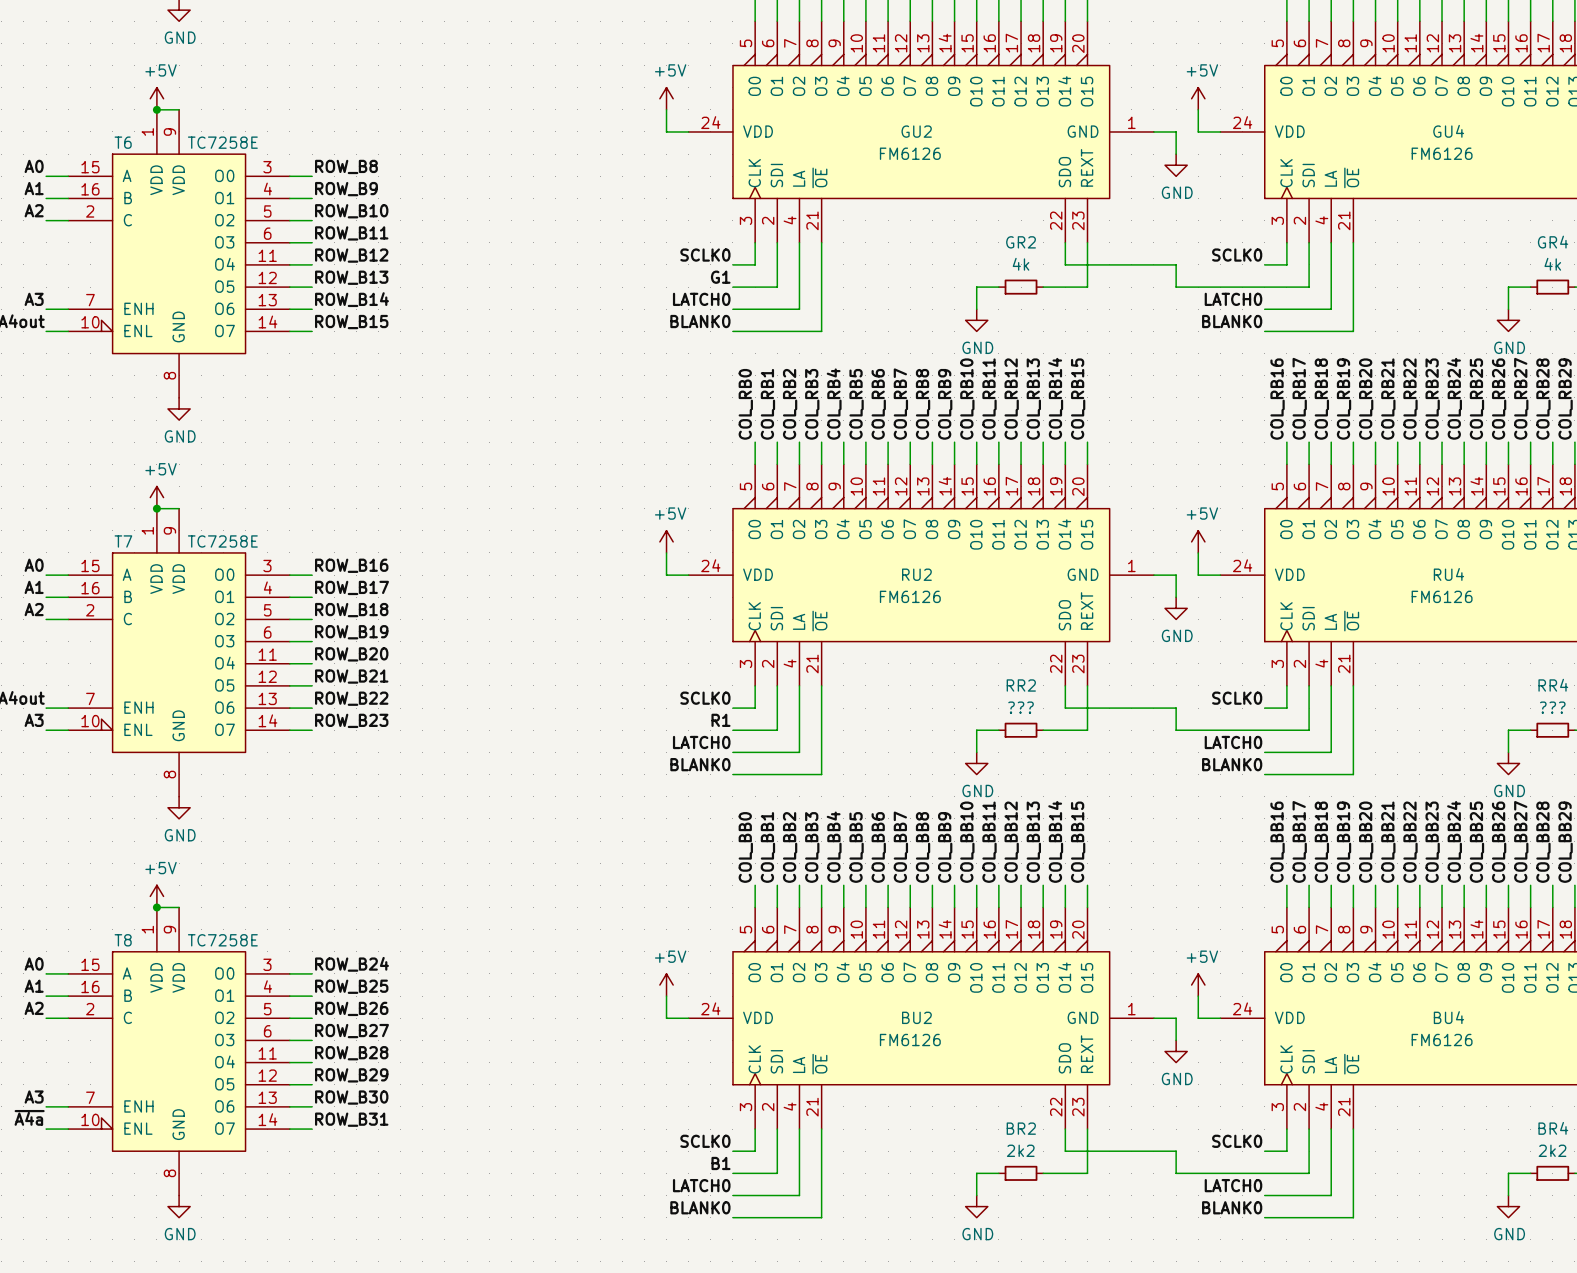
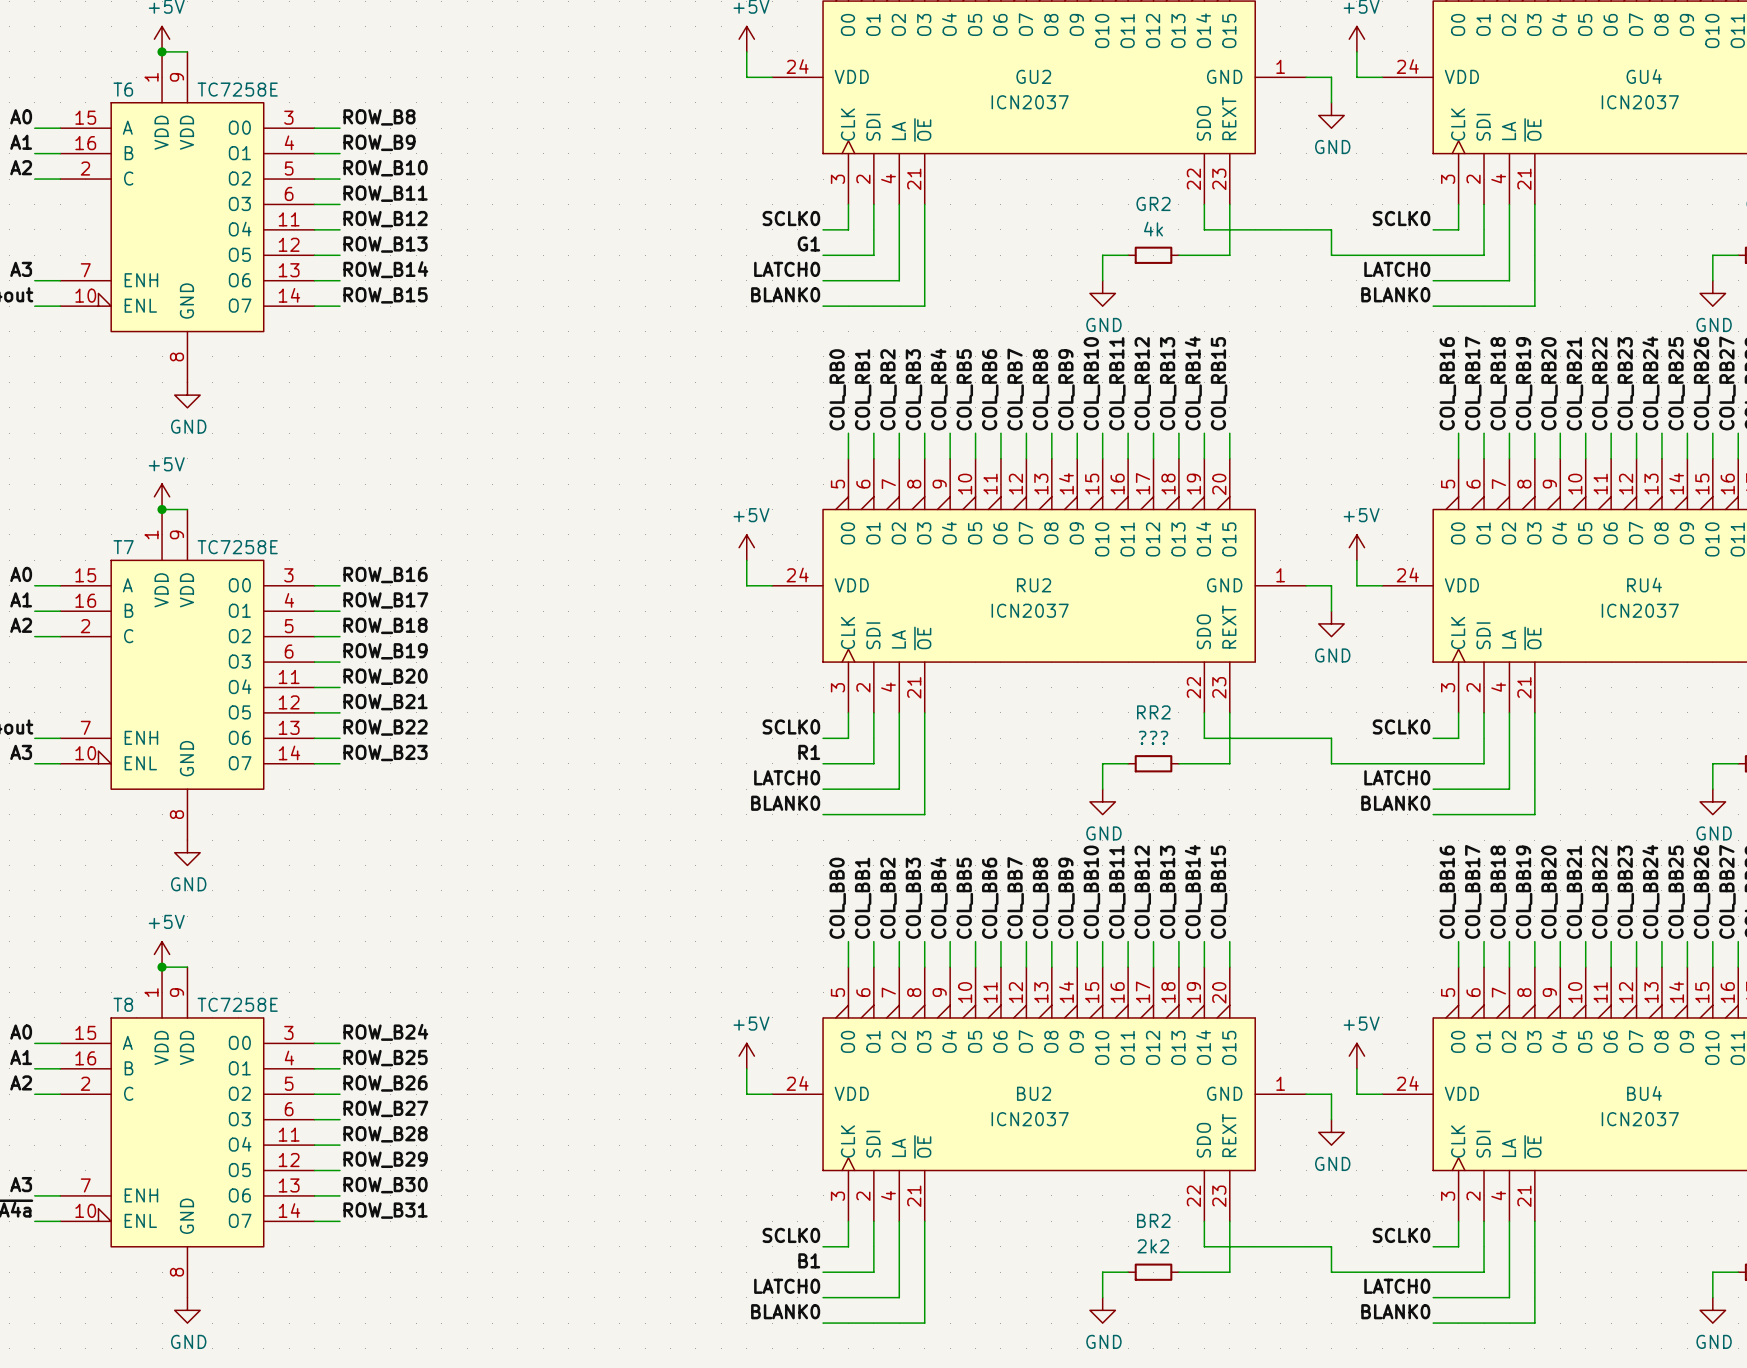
GU2 value: FM6126 (910, 153) -> ICN2037 (1030, 102)
GU4 value: FM6126 (1442, 153) -> ICN2037 (1640, 102)
RU2 value: FM6126 (910, 596) -> ICN2037 (1030, 610)
RU4 value: FM6126 (1442, 596) -> ICN2037 (1640, 610)
BU2 value: FM6126 (910, 1040) -> ICN2037 (1030, 1119)
BU4 value: FM6126 (1442, 1040) -> ICN2037 (1640, 1119)

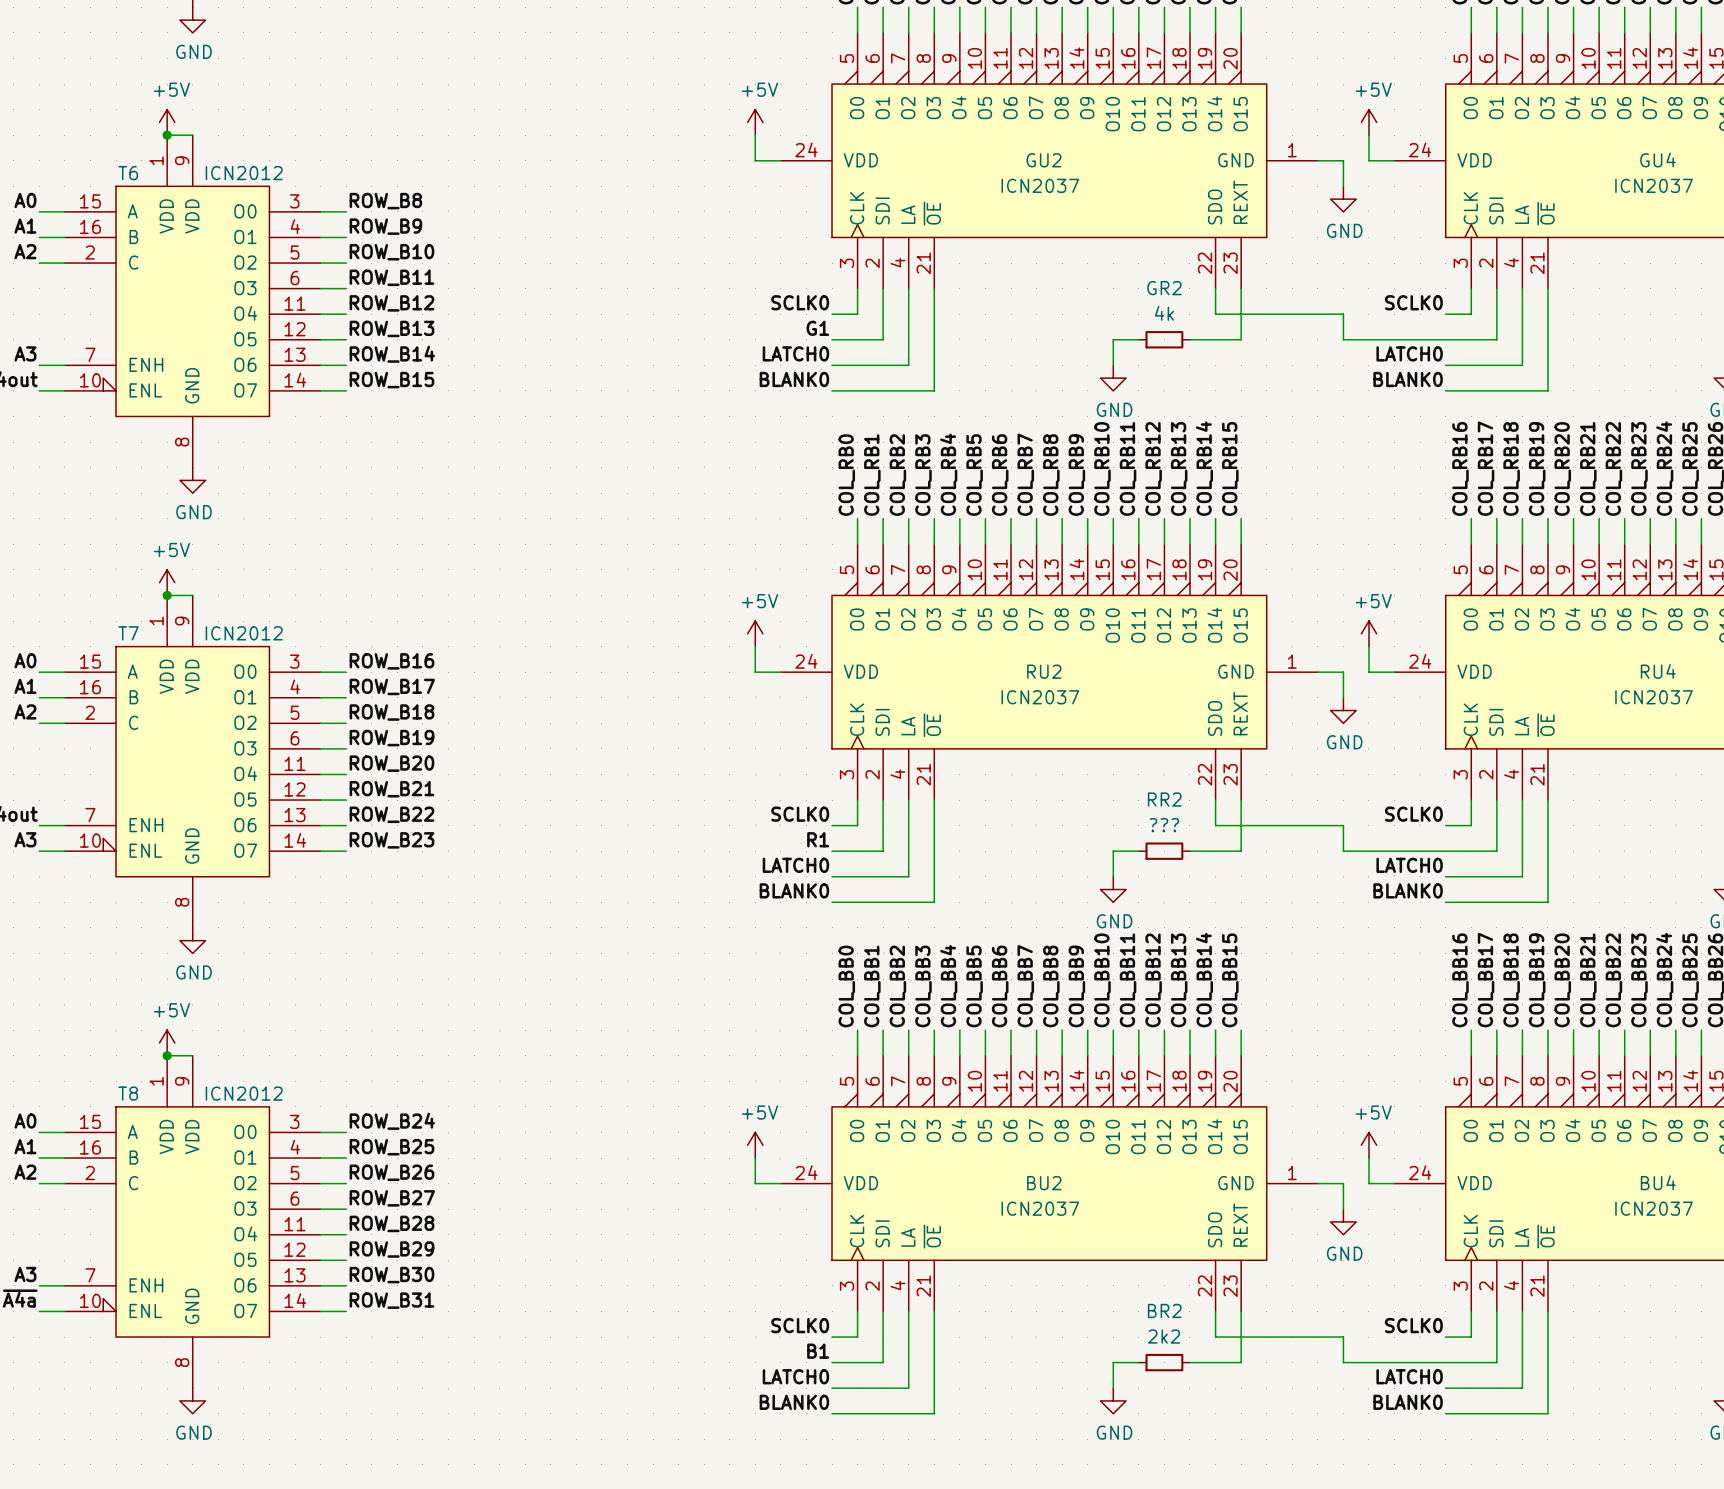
T6 value: TC7258E (237, 89) -> ICN2012 (244, 173)
T7 value: TC7258E (237, 547) -> ICN2012 (244, 633)
T8 value: TC7258E (237, 1004) -> ICN2012 (244, 1093)

